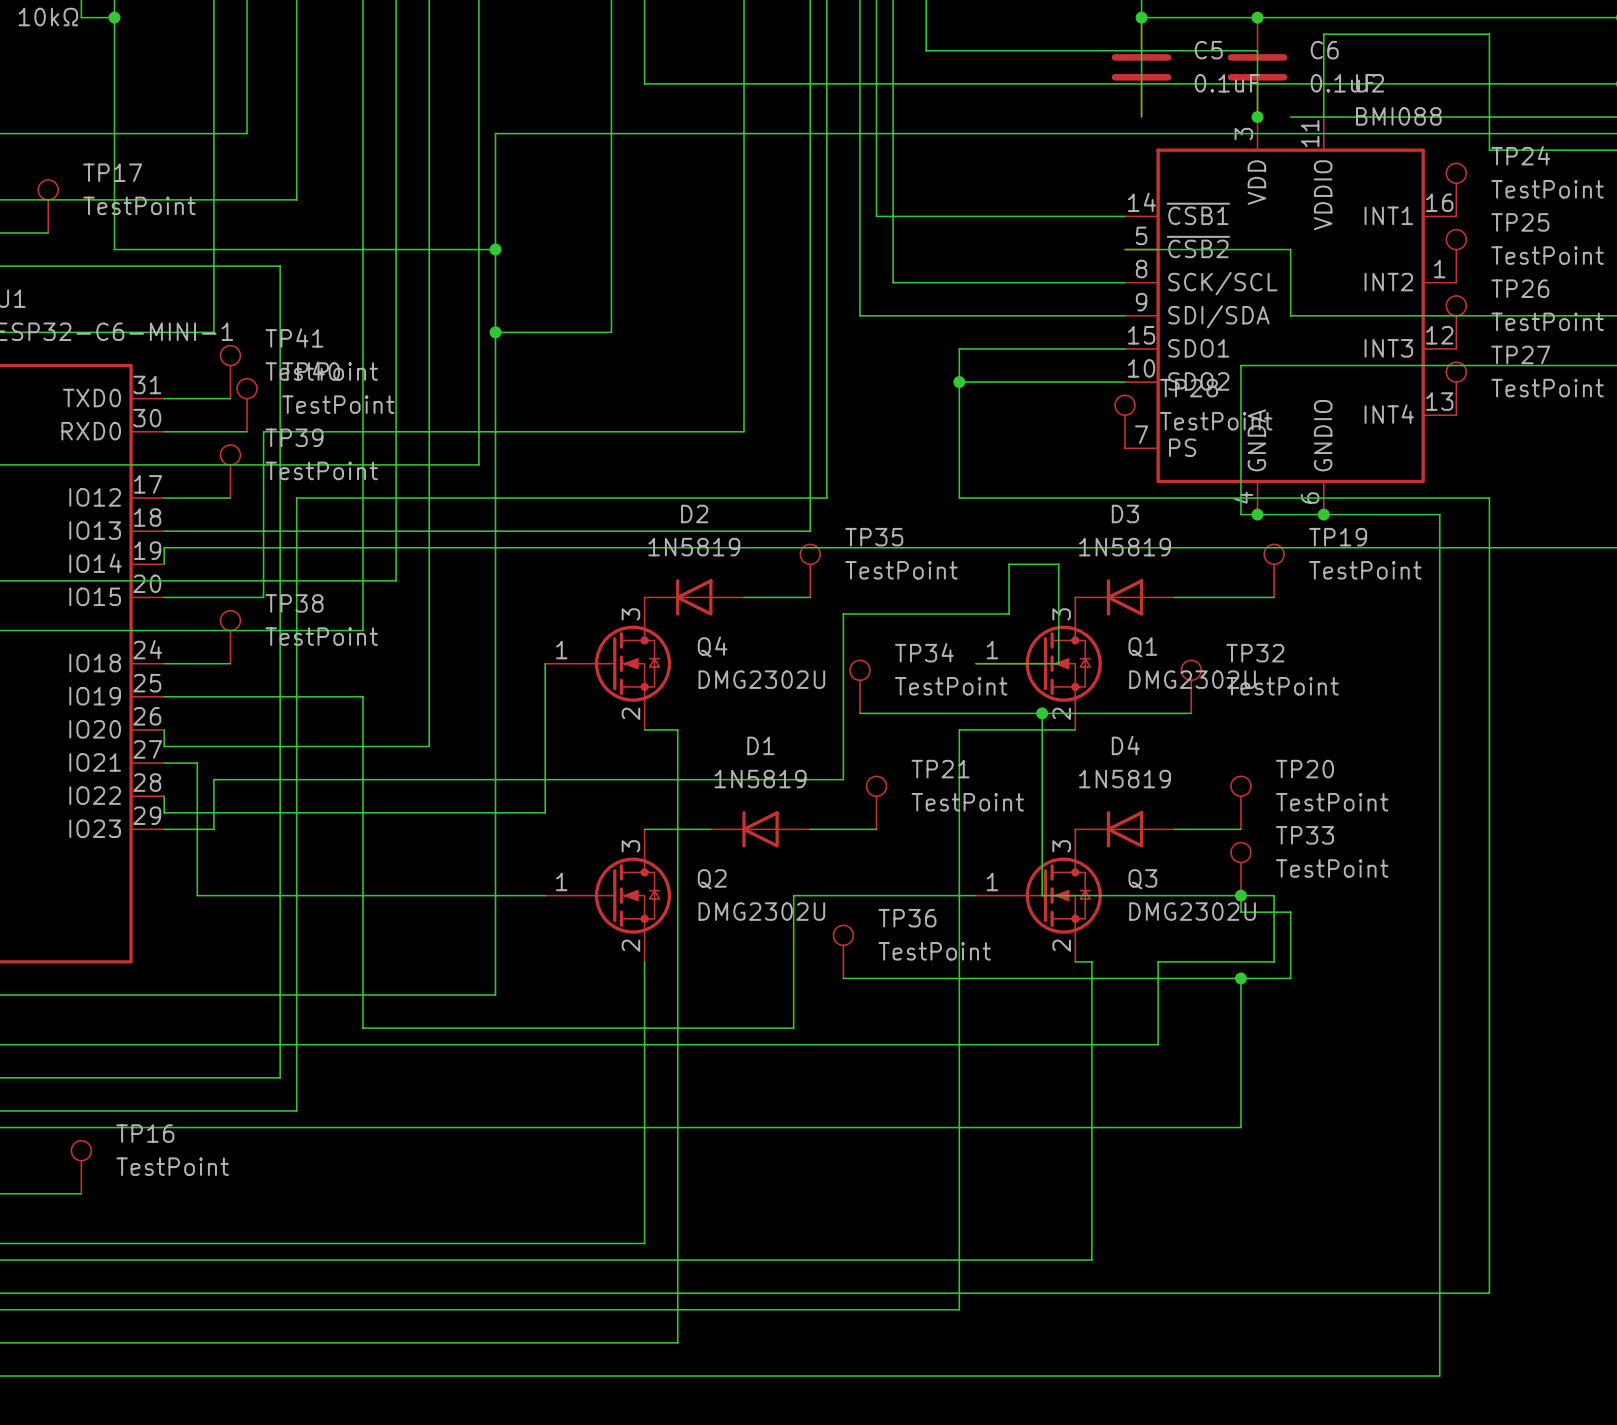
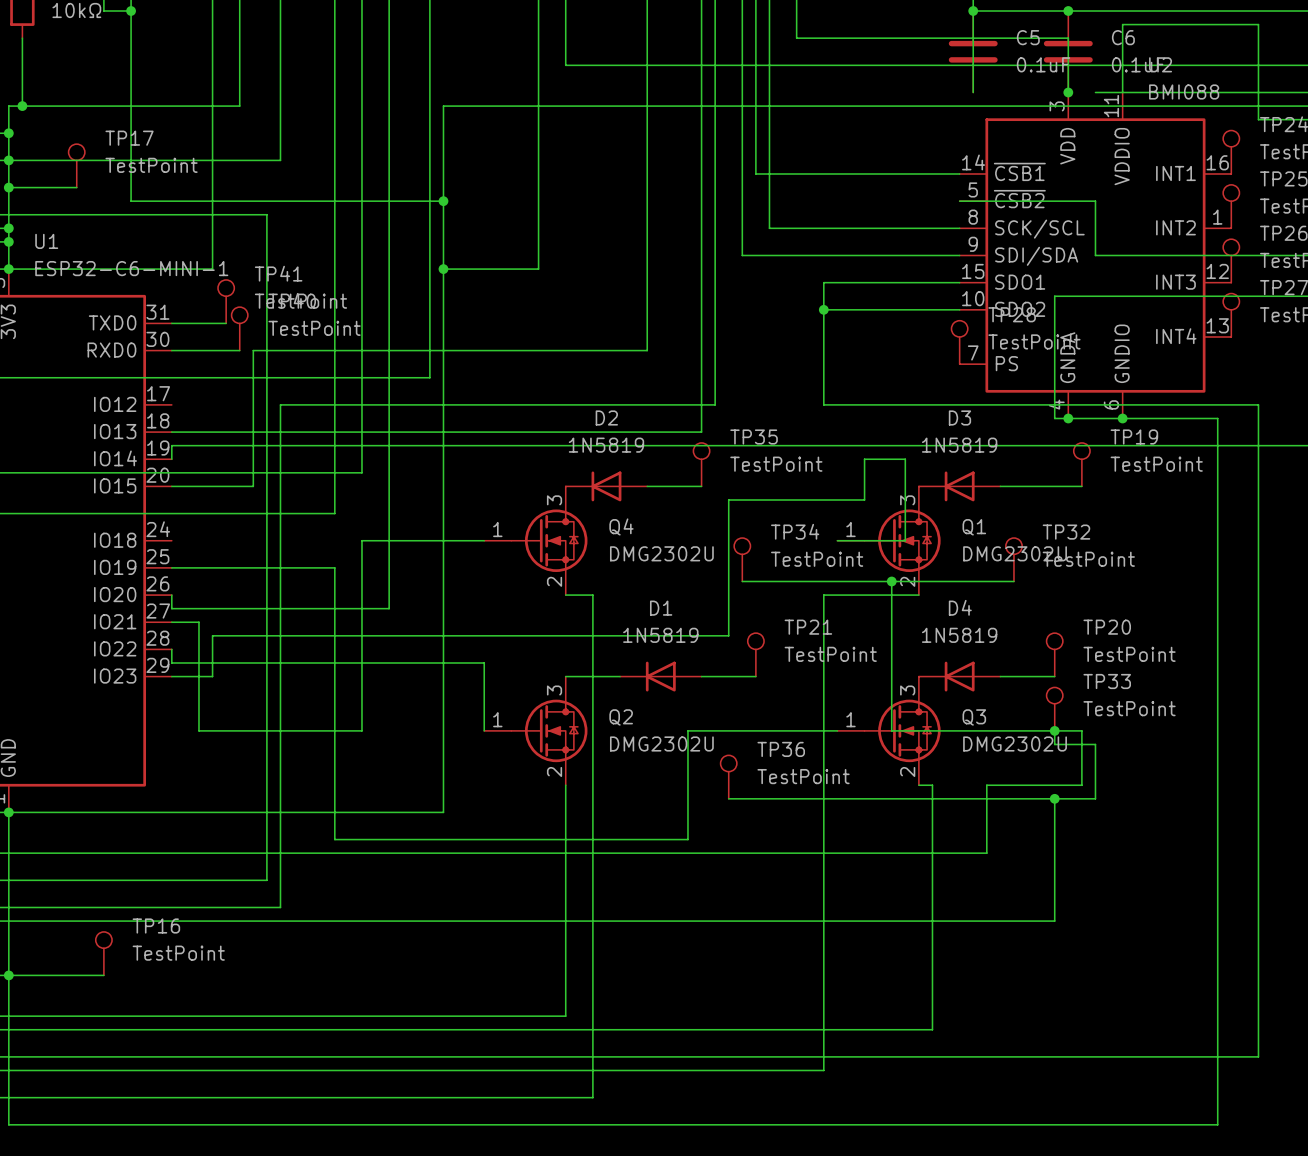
TP39: TestPoint (230, 471) -> none
wire: (164, 498) (230, 498) -> none
TP38: TestPoint (230, 637) -> none
wire: (164, 663) (230, 663) -> none
wire: (545, 663) (545, 812) -> (484, 540) (361, 540) (361, 730)
wire: (396, 895) (545, 895) -> (484, 662) (484, 730)

